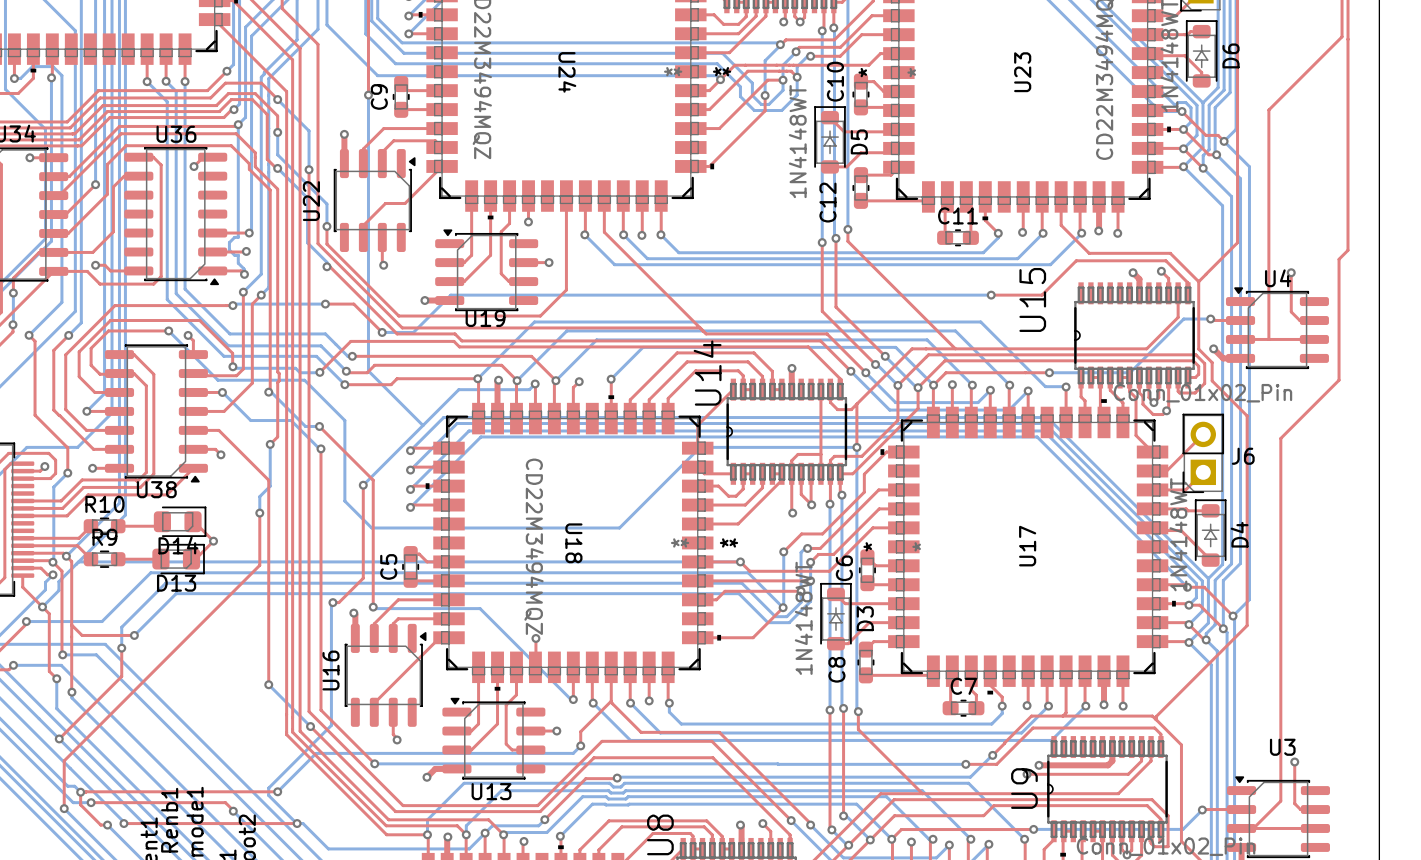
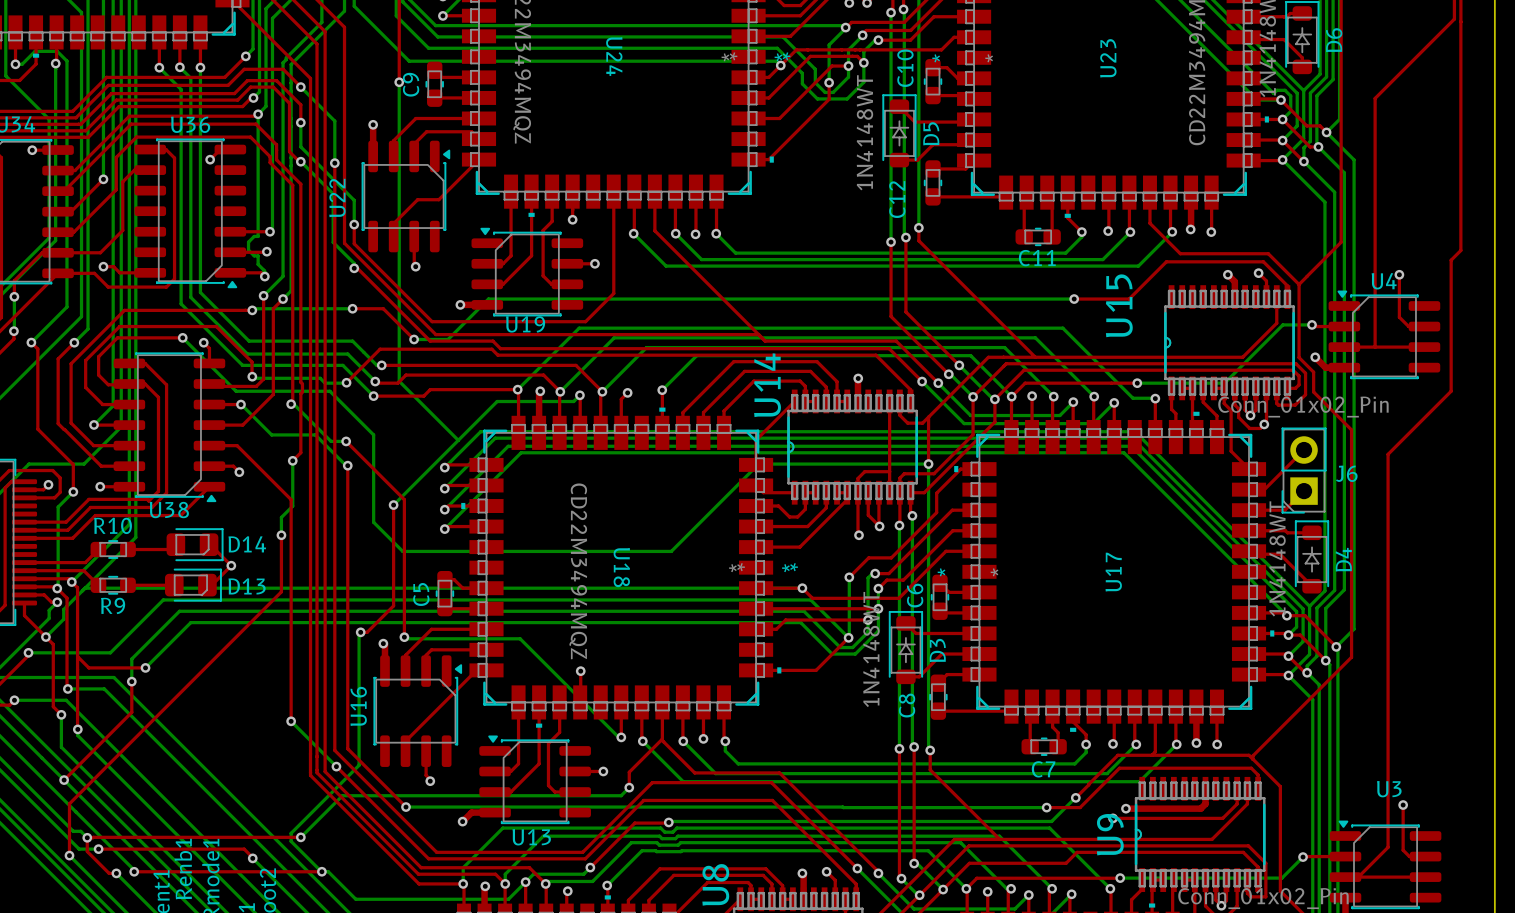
C11 name position: C11 (958, 215) -> C11 (1037, 258)
R9 name position: R9 (104, 537) -> R9 (113, 605)
D14 name position: D14 (178, 545) -> D14 (247, 544)
D13 name position: D13 (176, 583) -> D13 (247, 586)
C7 name position: C7 (963, 686) -> C7 (1043, 769)

